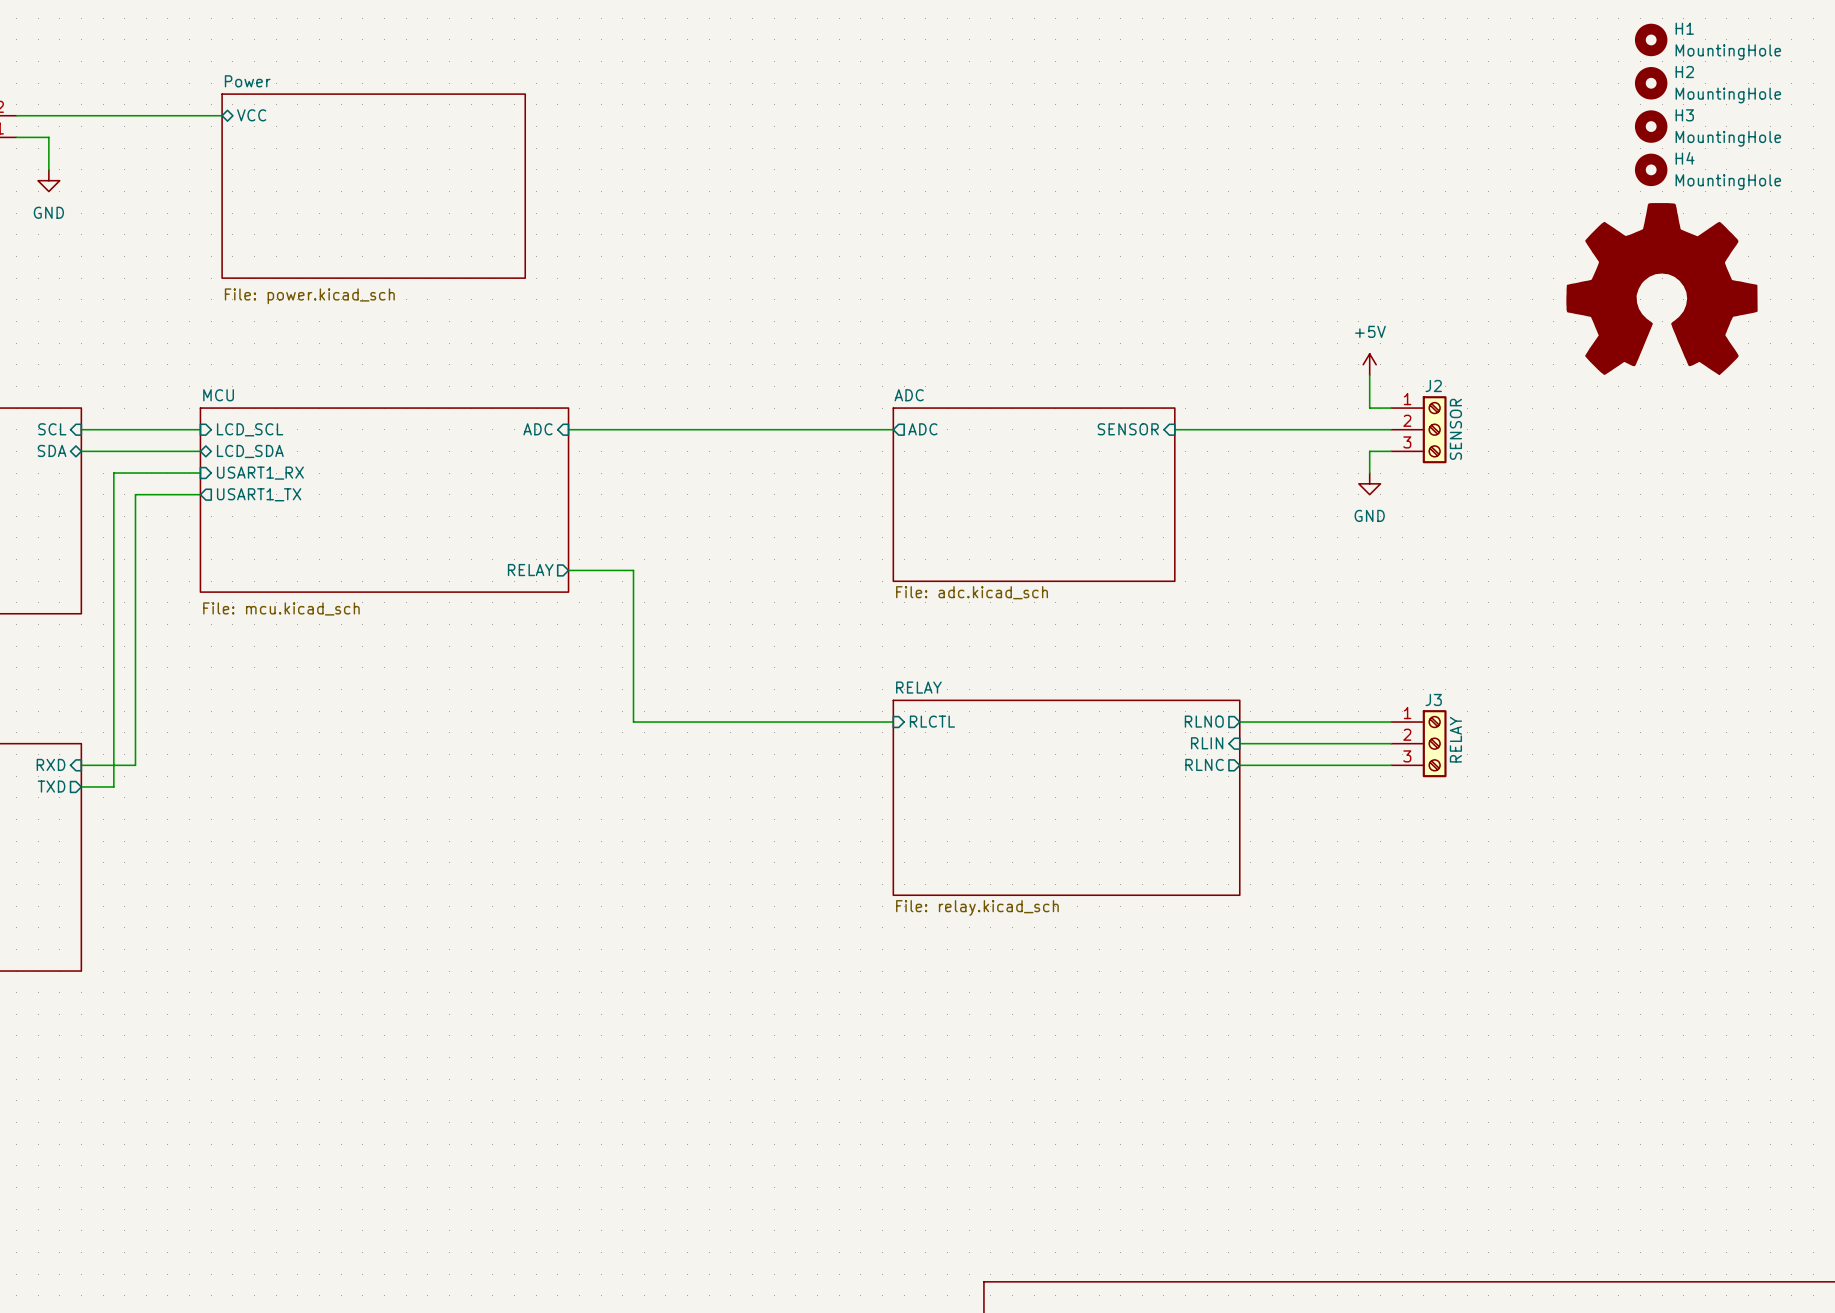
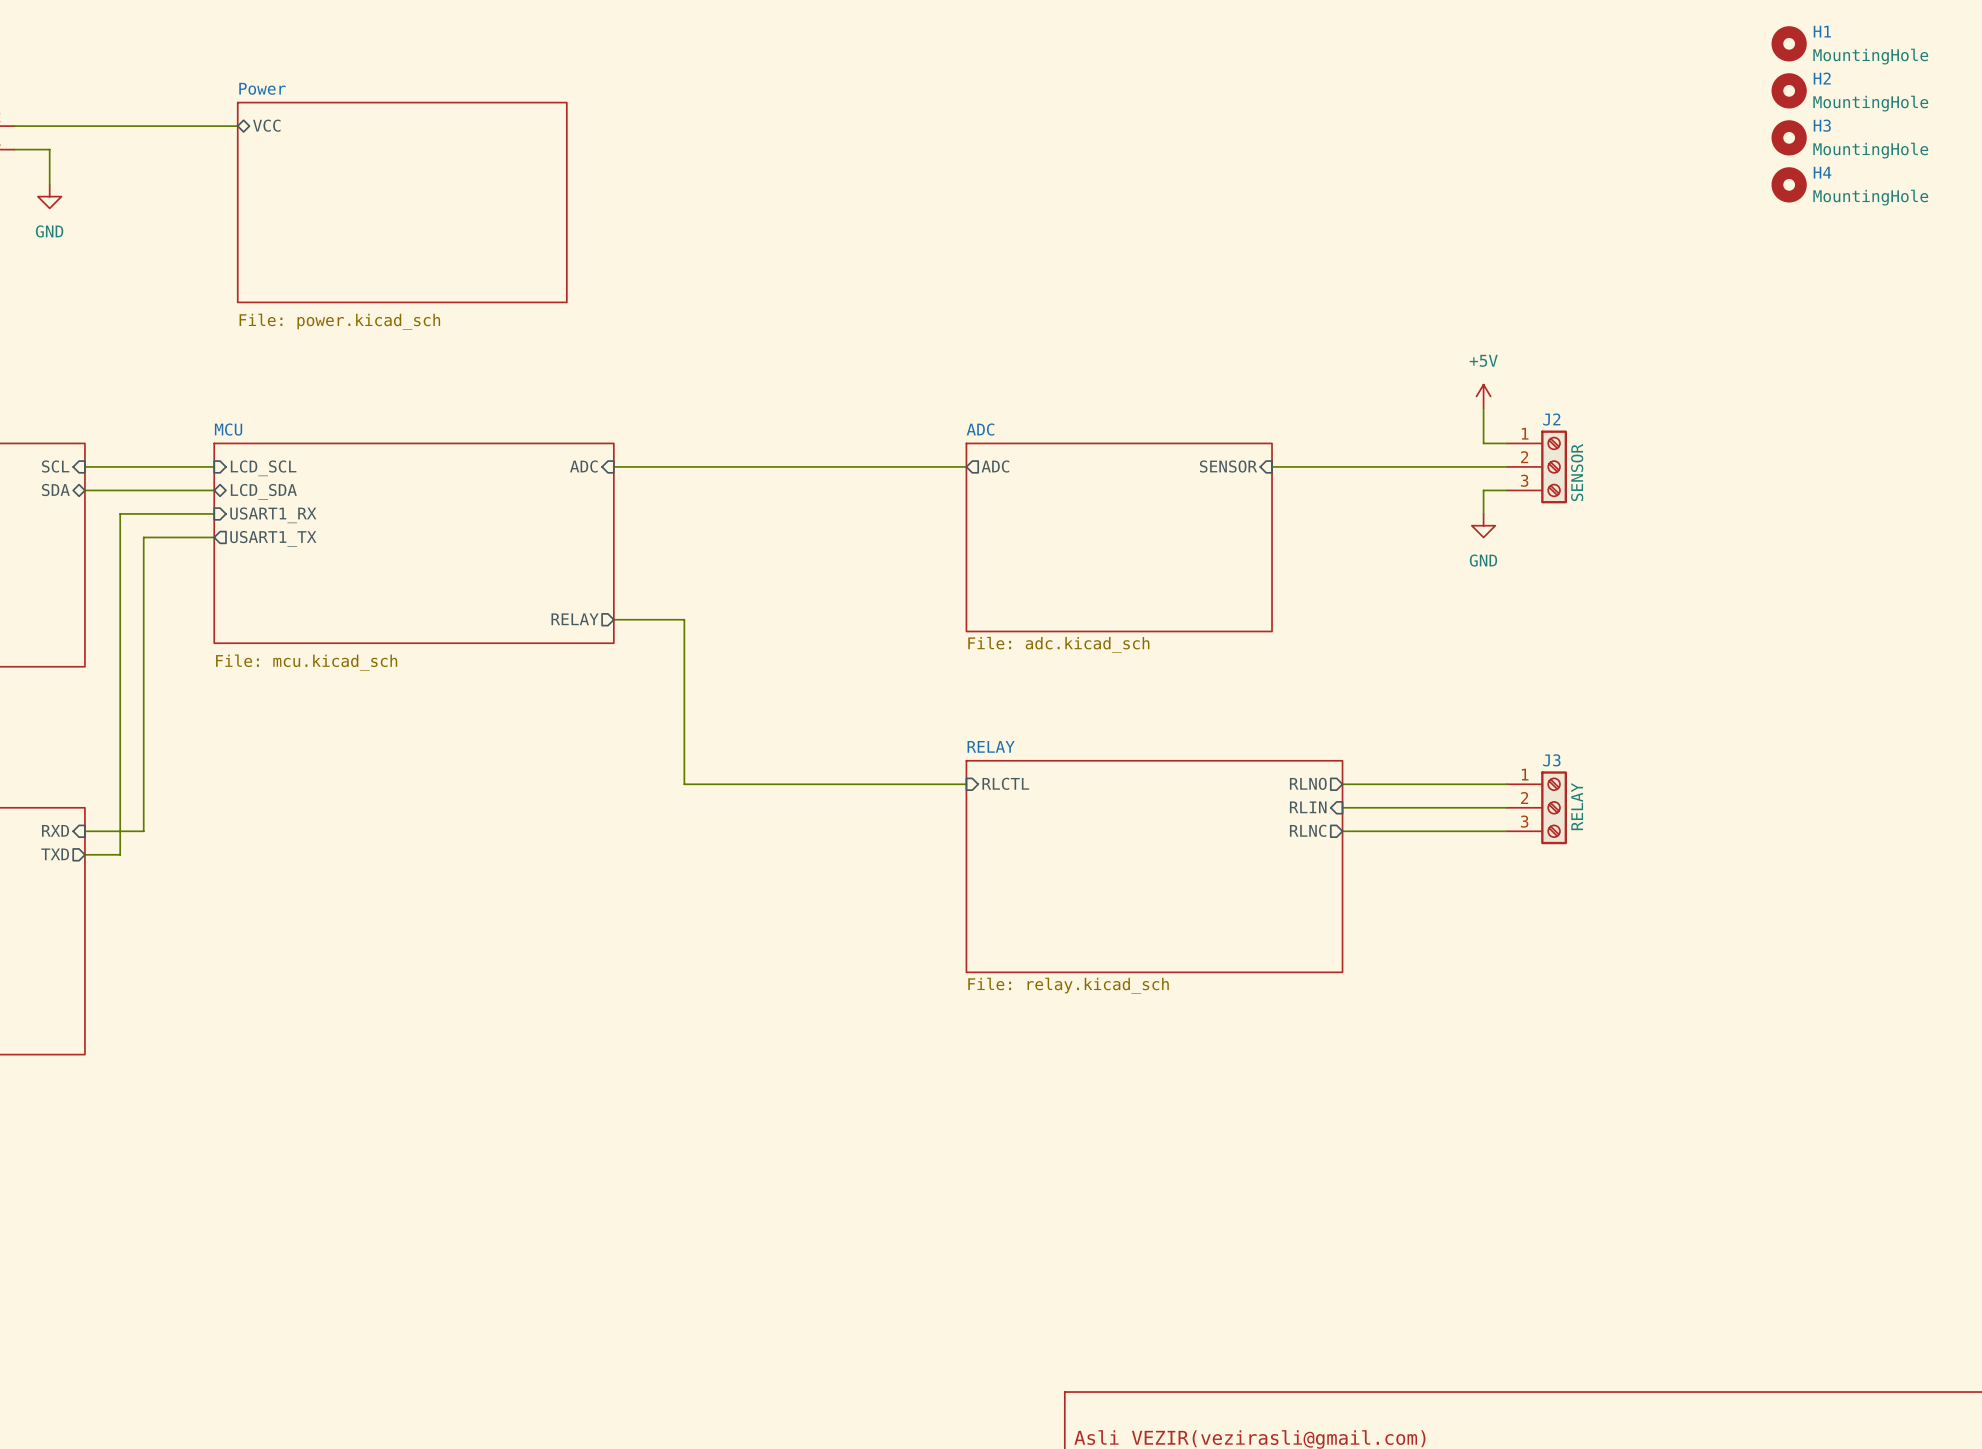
power symbol: (1662, 288) -> none

